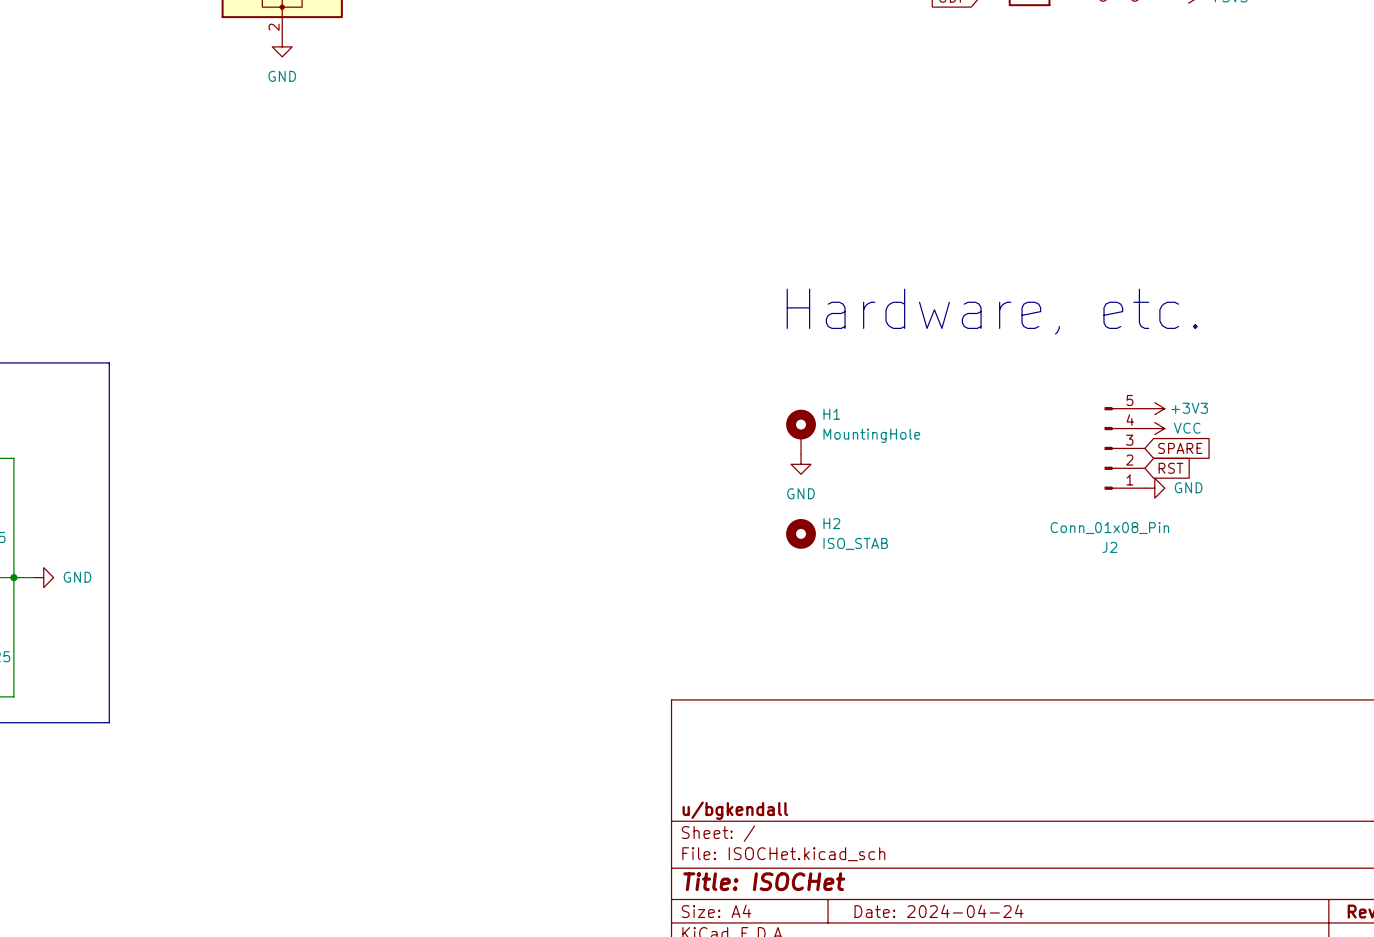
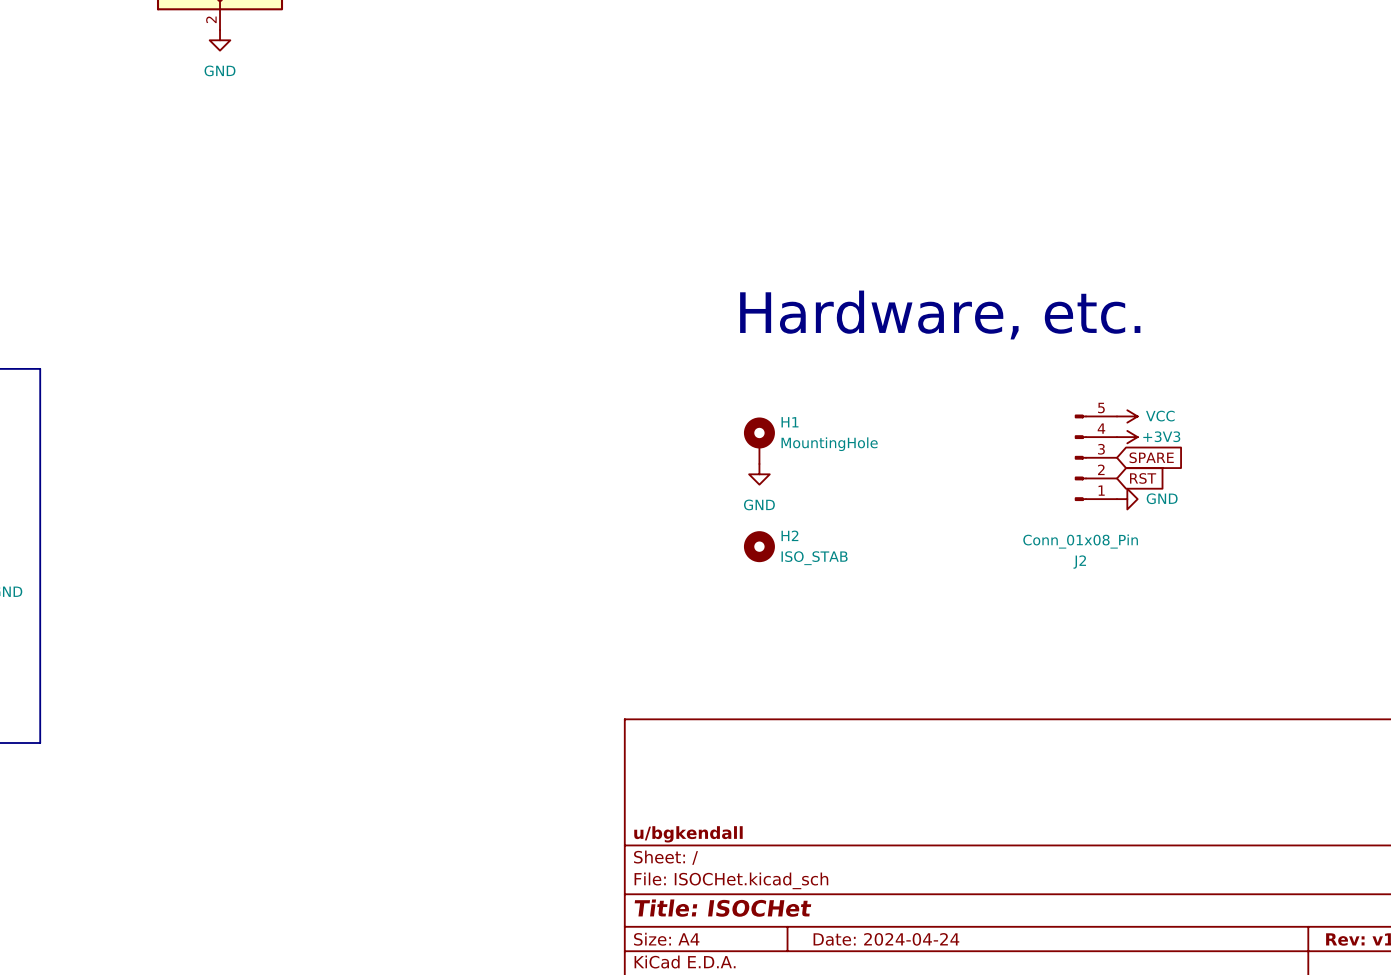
power symbol: +3V3 (1154, 408) -> VCC (1127, 416)
power symbol: VCC (1154, 428) -> +3V3 (1127, 437)

